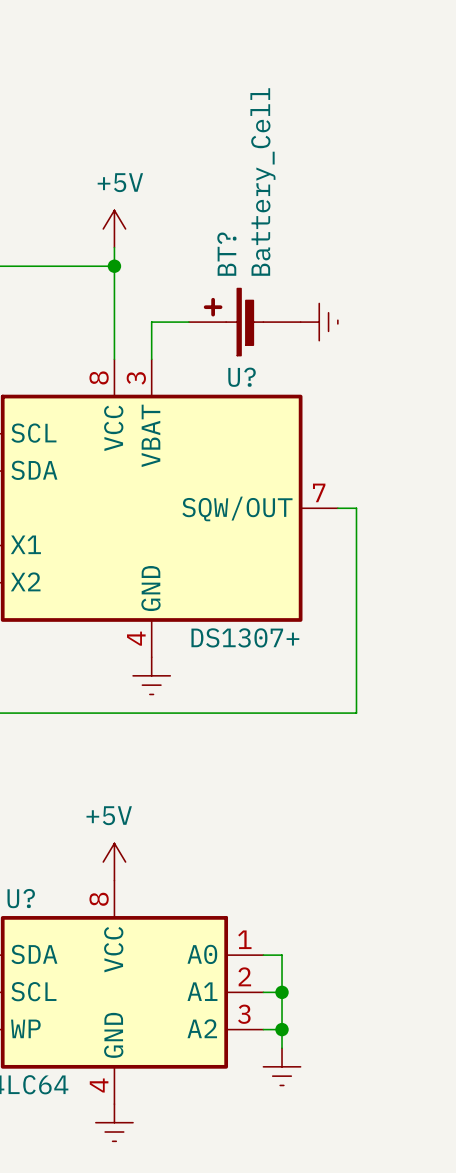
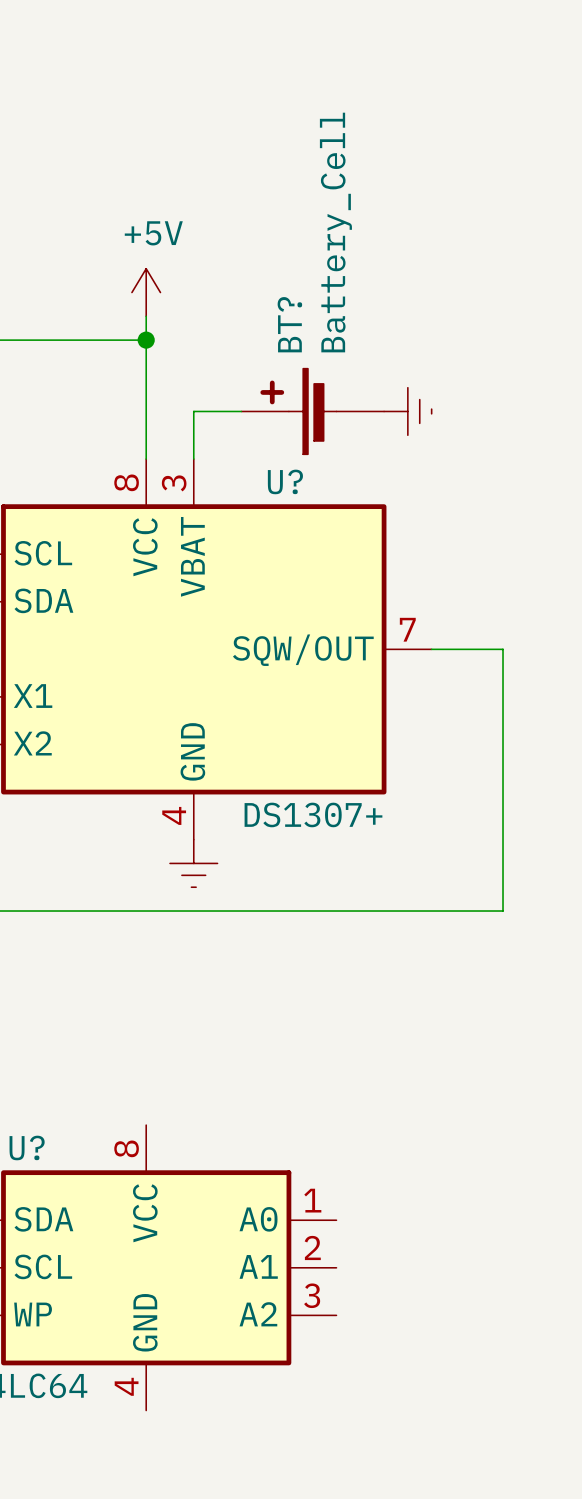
U? name position: U? (242, 377) -> U? (285, 481)
wire: (356, 508) (356, 713) -> (455, 649) (503, 649) (503, 911) (455, 911)
power symbol: +5V (114, 862) -> none
wire: (263, 955) (282, 955) (282, 1048) -> none
wire: (263, 992) (282, 992) -> none
junction: (282, 992) -> none
wire: (263, 1029) (282, 1029) -> none
junction: (282, 1029) -> none
power symbol: (282, 1066) -> none
power symbol: (114, 1122) -> none

